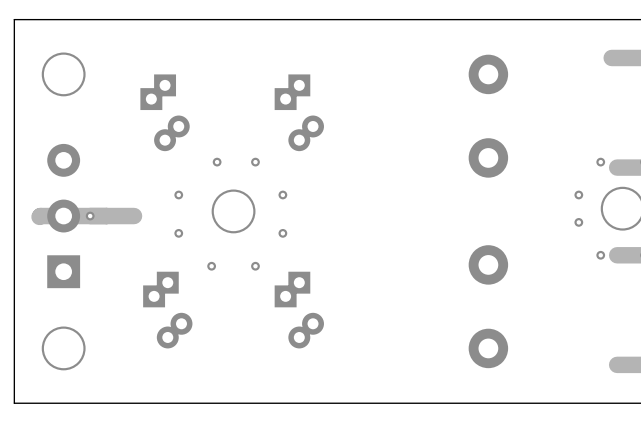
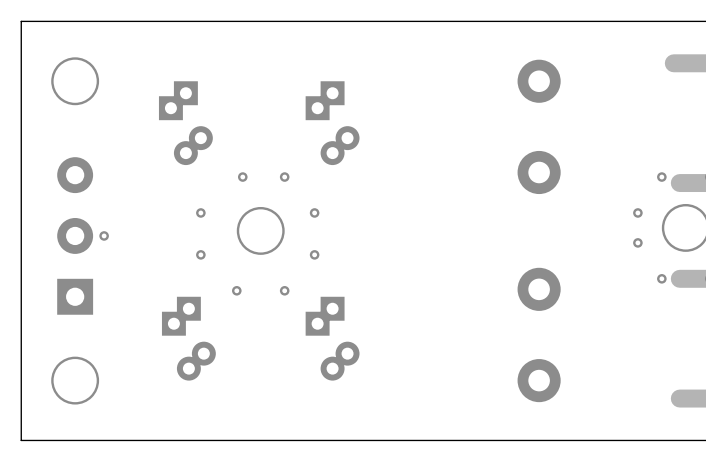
track: (134, 216) (39, 216) -> none

